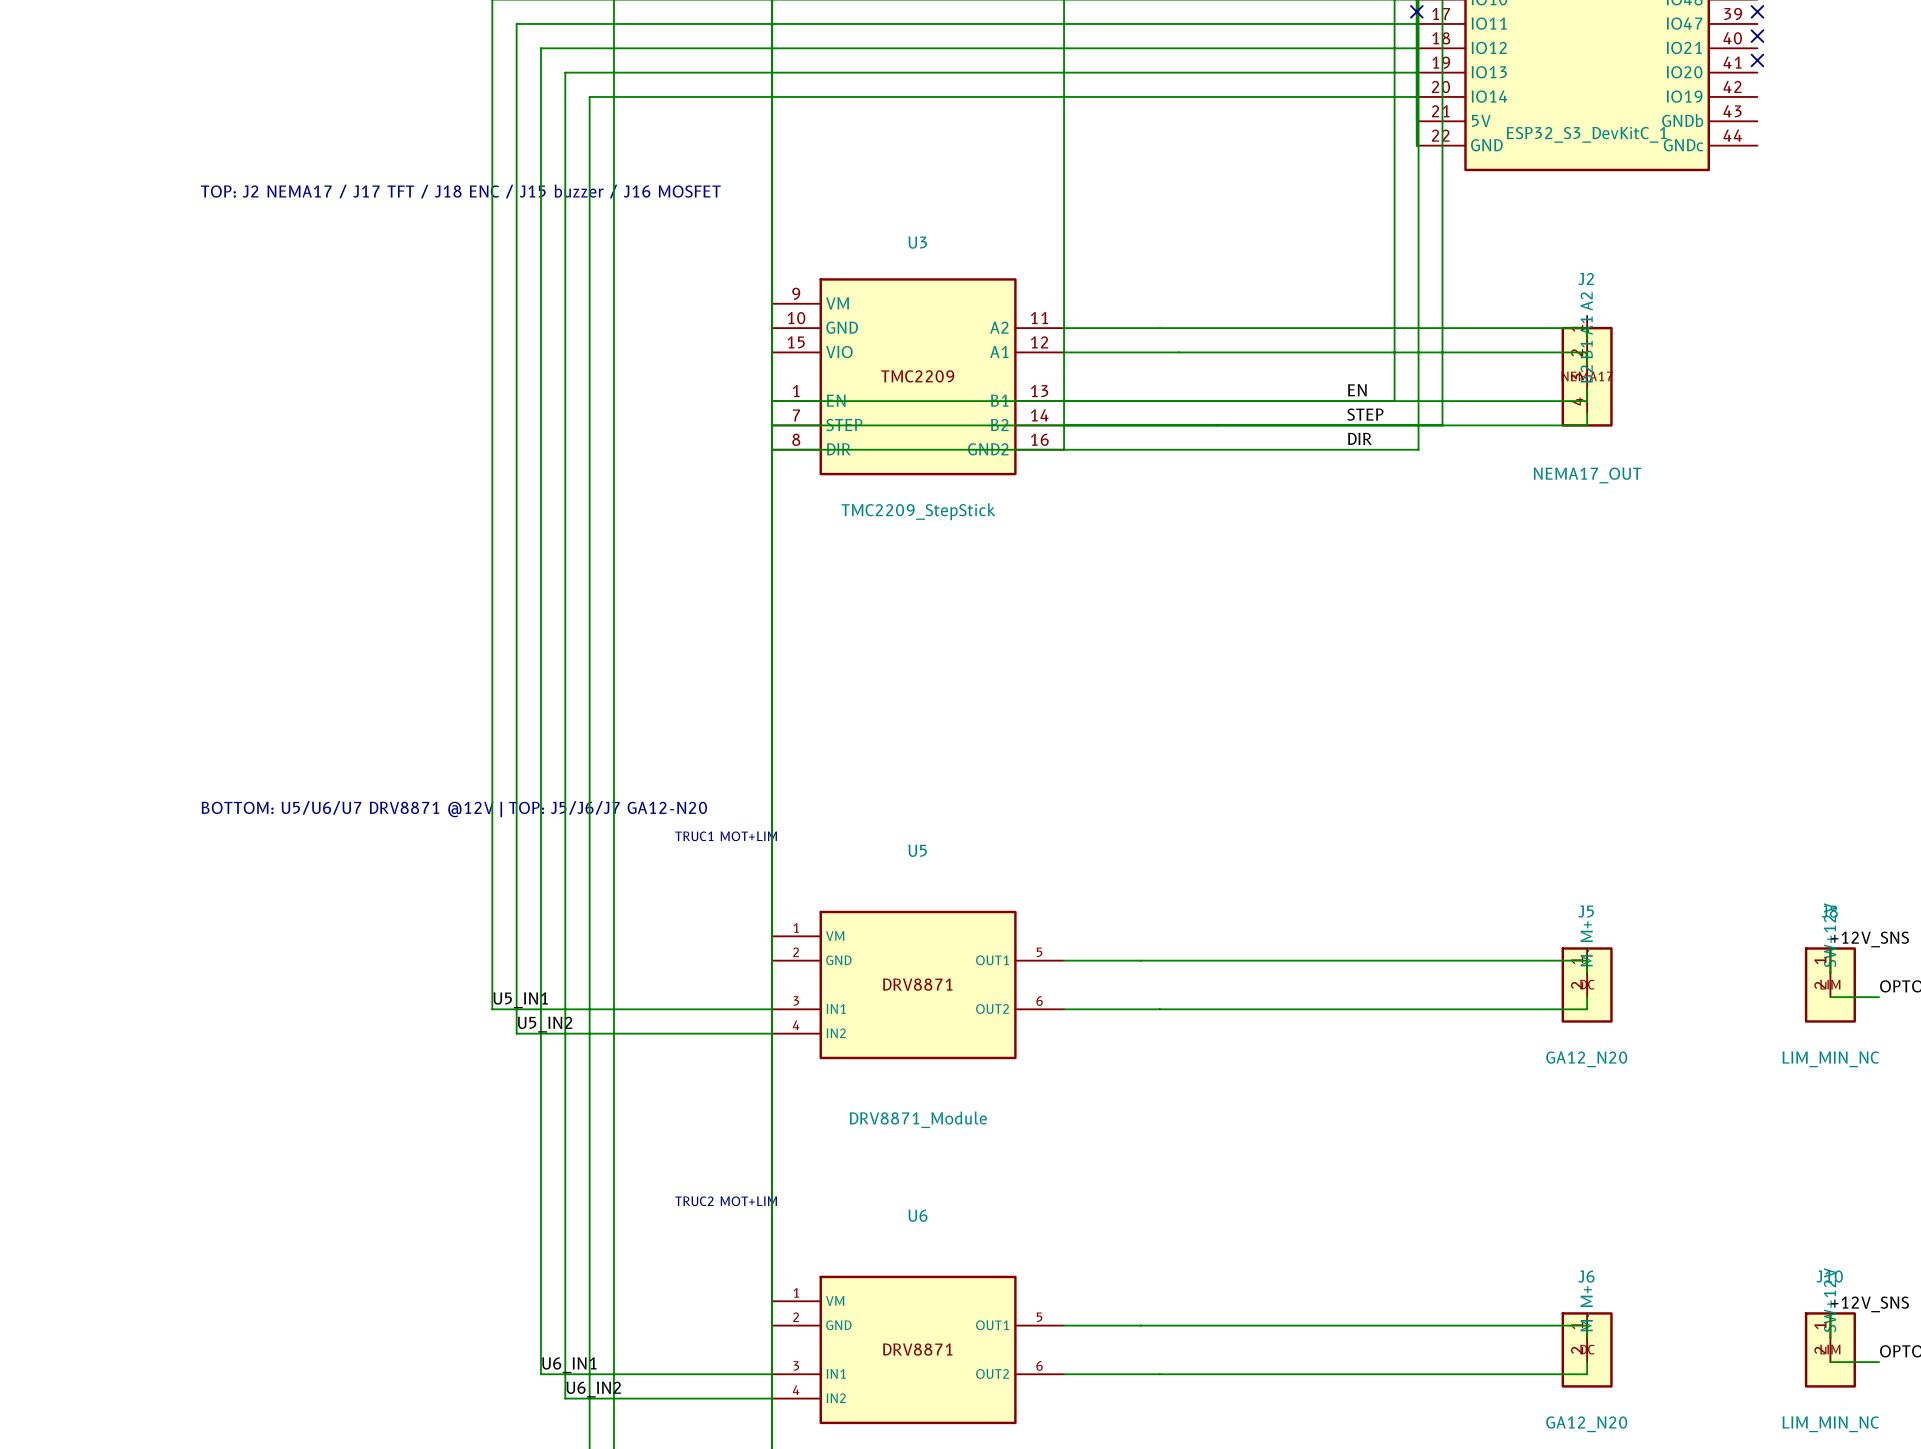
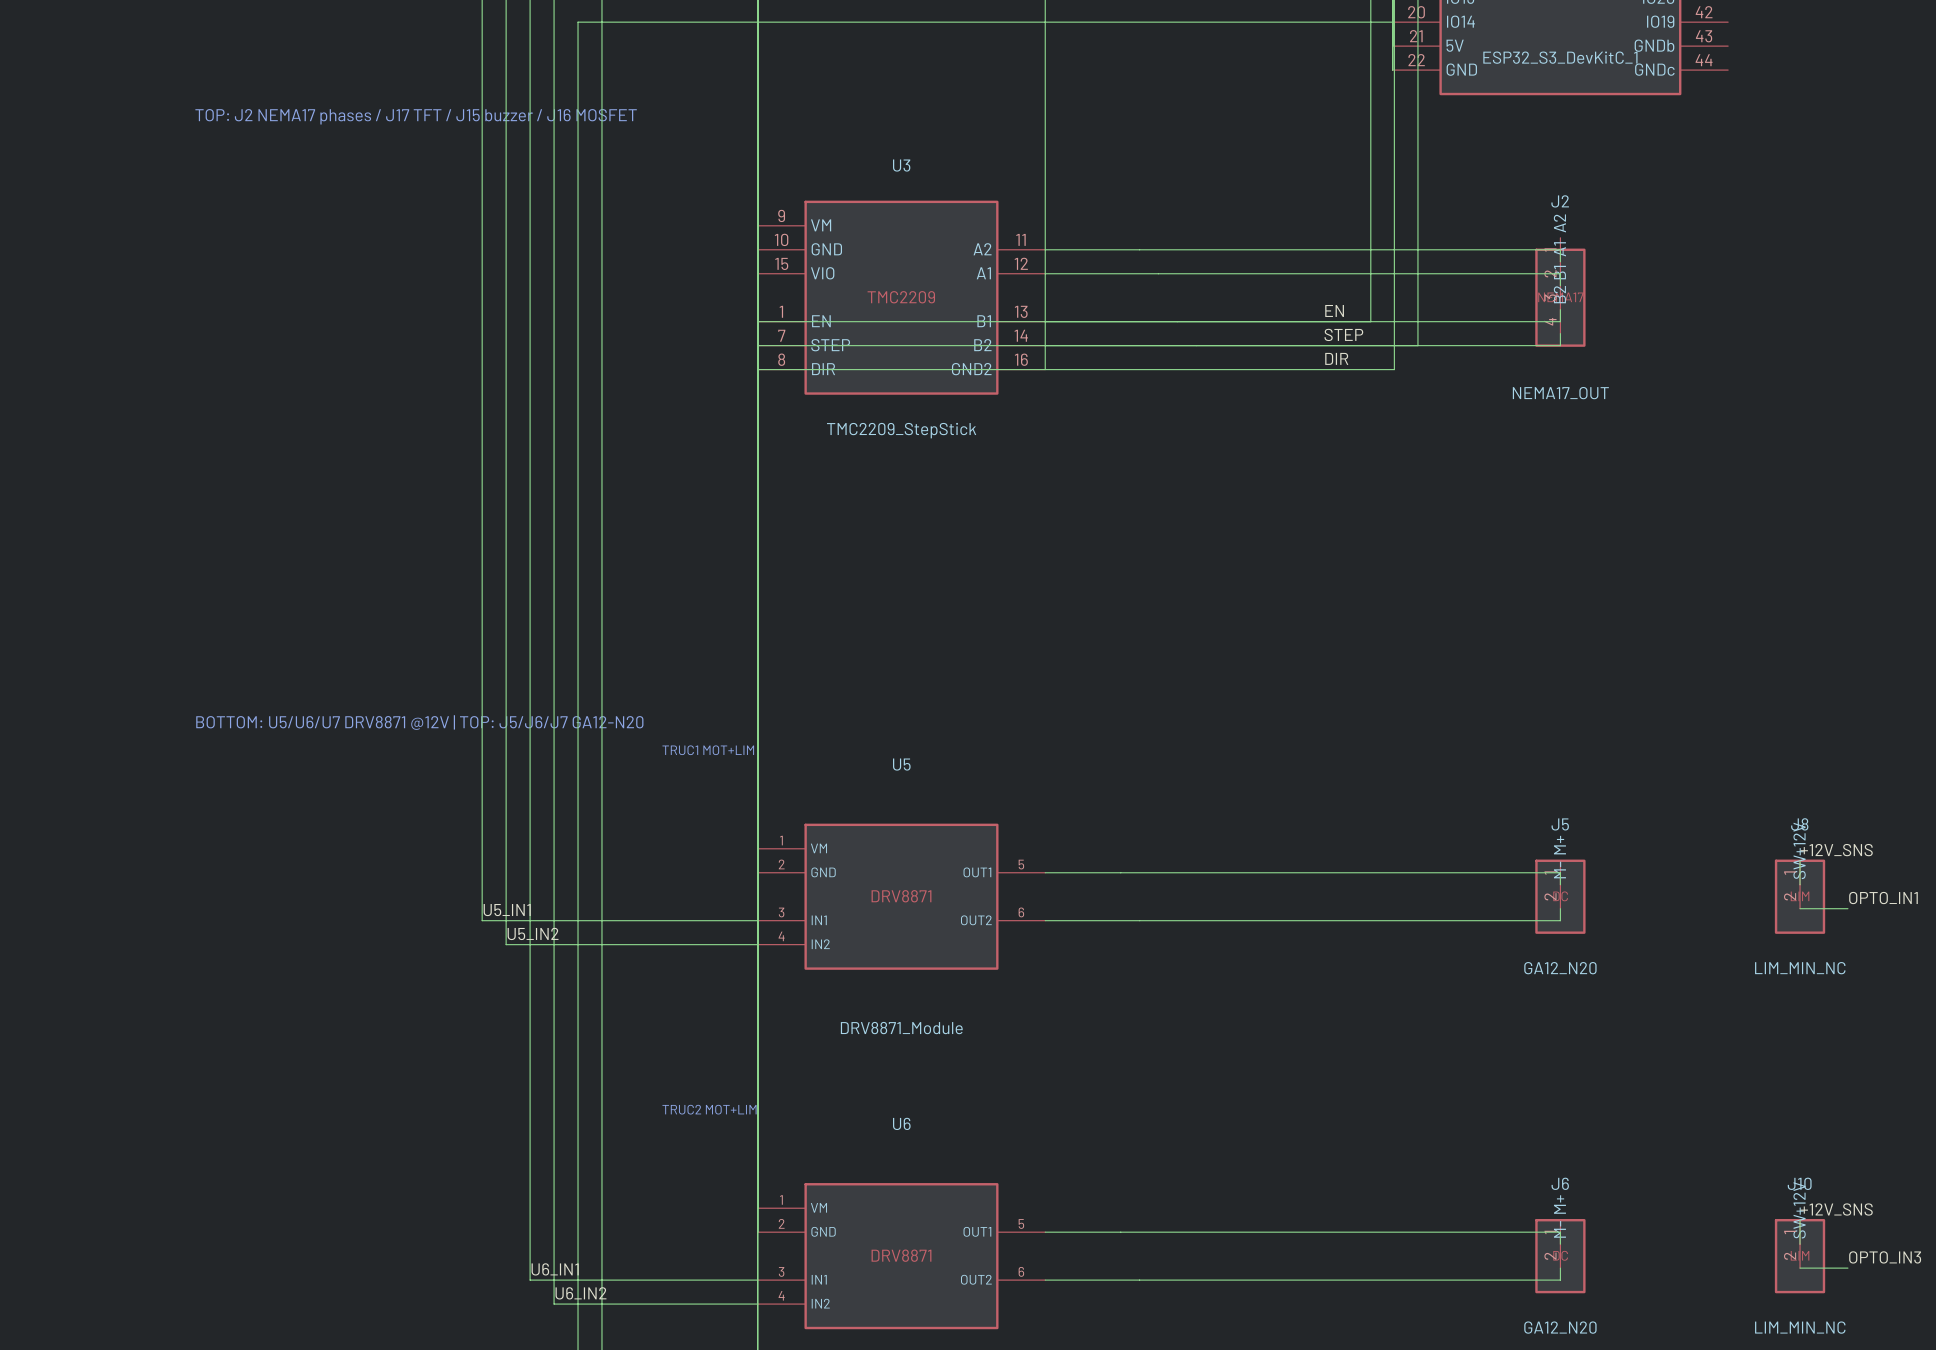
text: TOP: J2 NEMA17 / J17 TFT / J18 ENC / J15 buzzer / J16 MOSFET (460, 191) -> TOP: J2 NEMA17 phases / J17 TFT / J15 buzzer / J16 MOSFET (416, 116)

